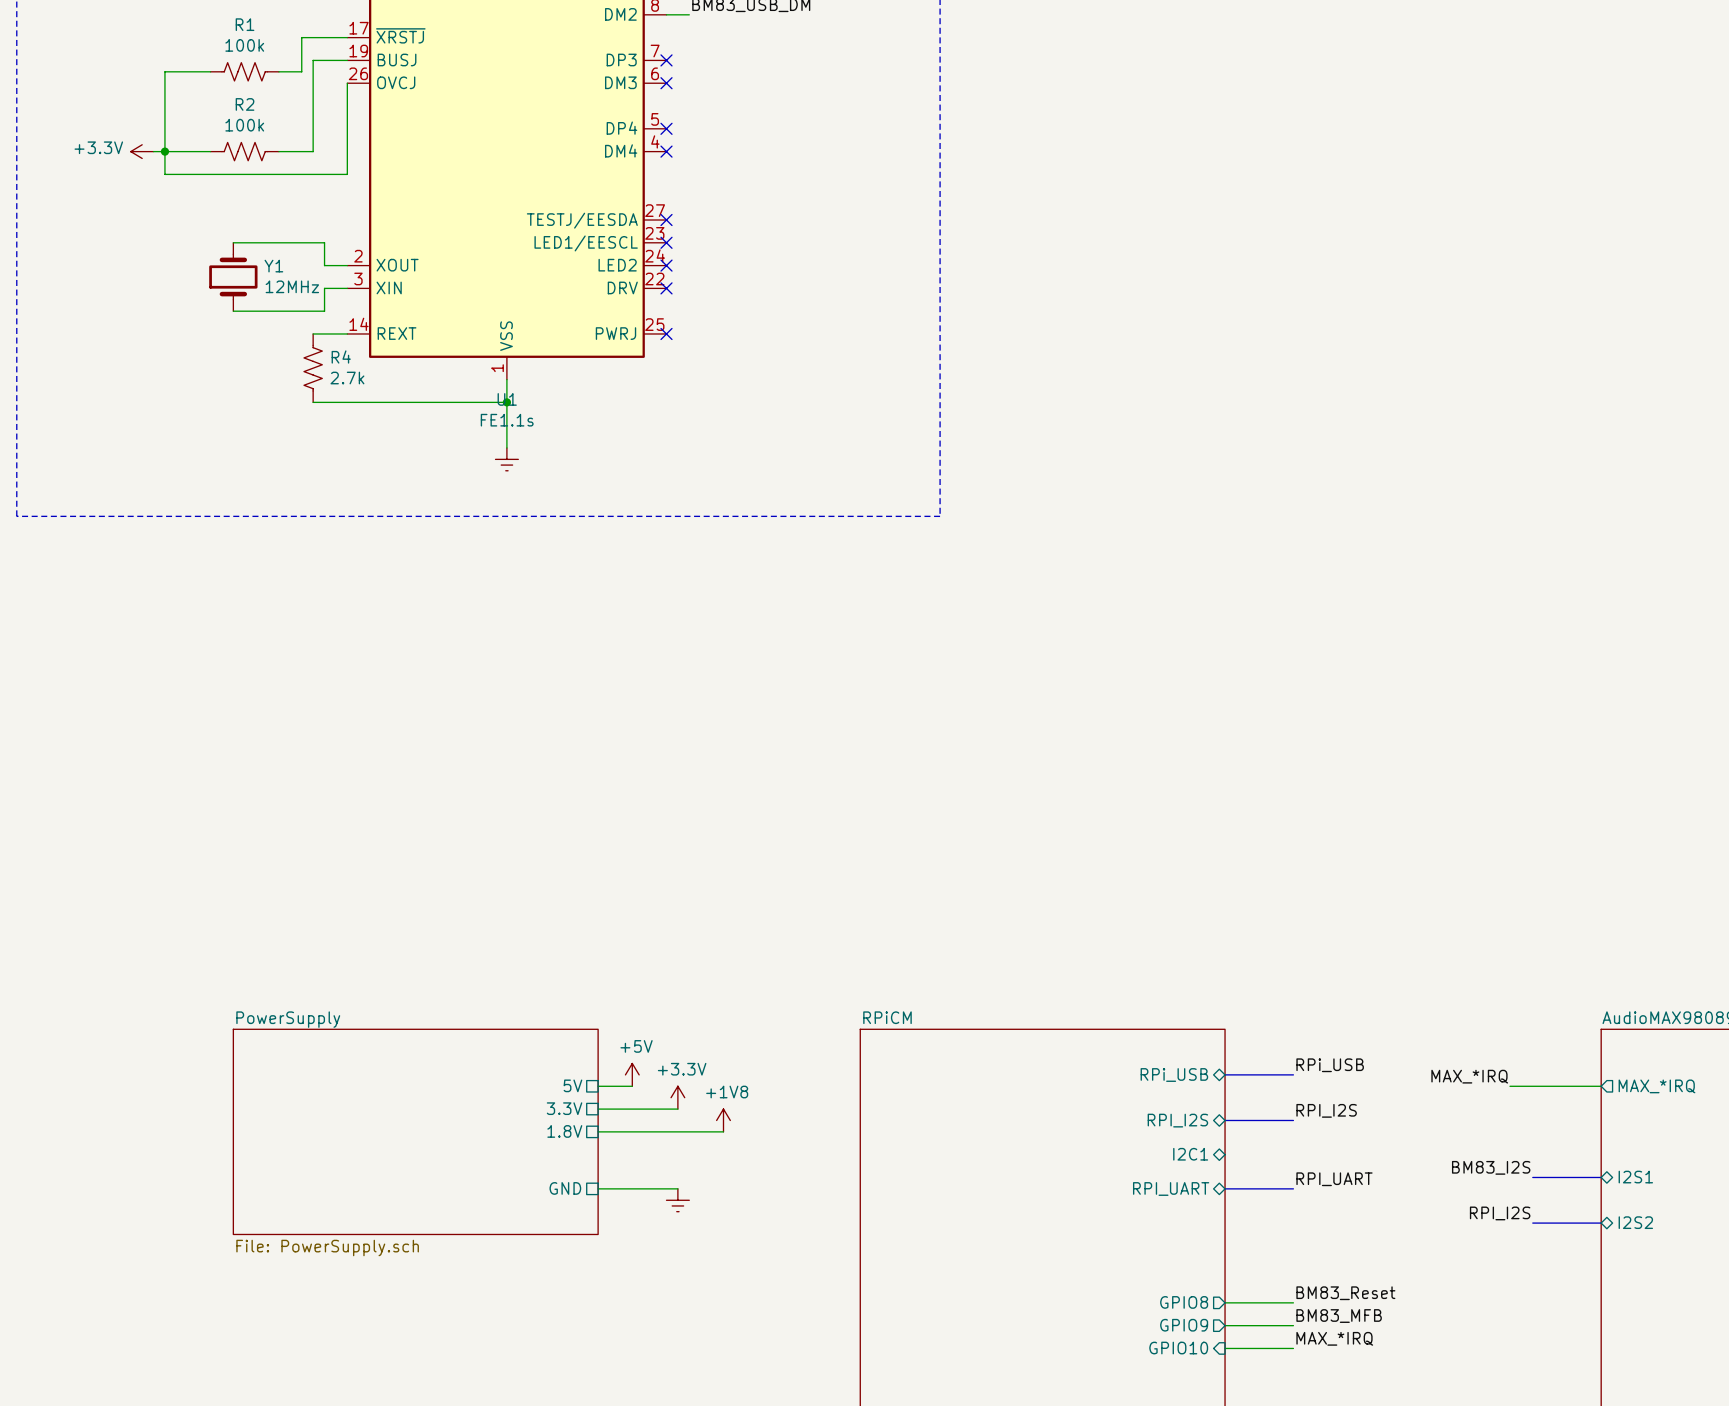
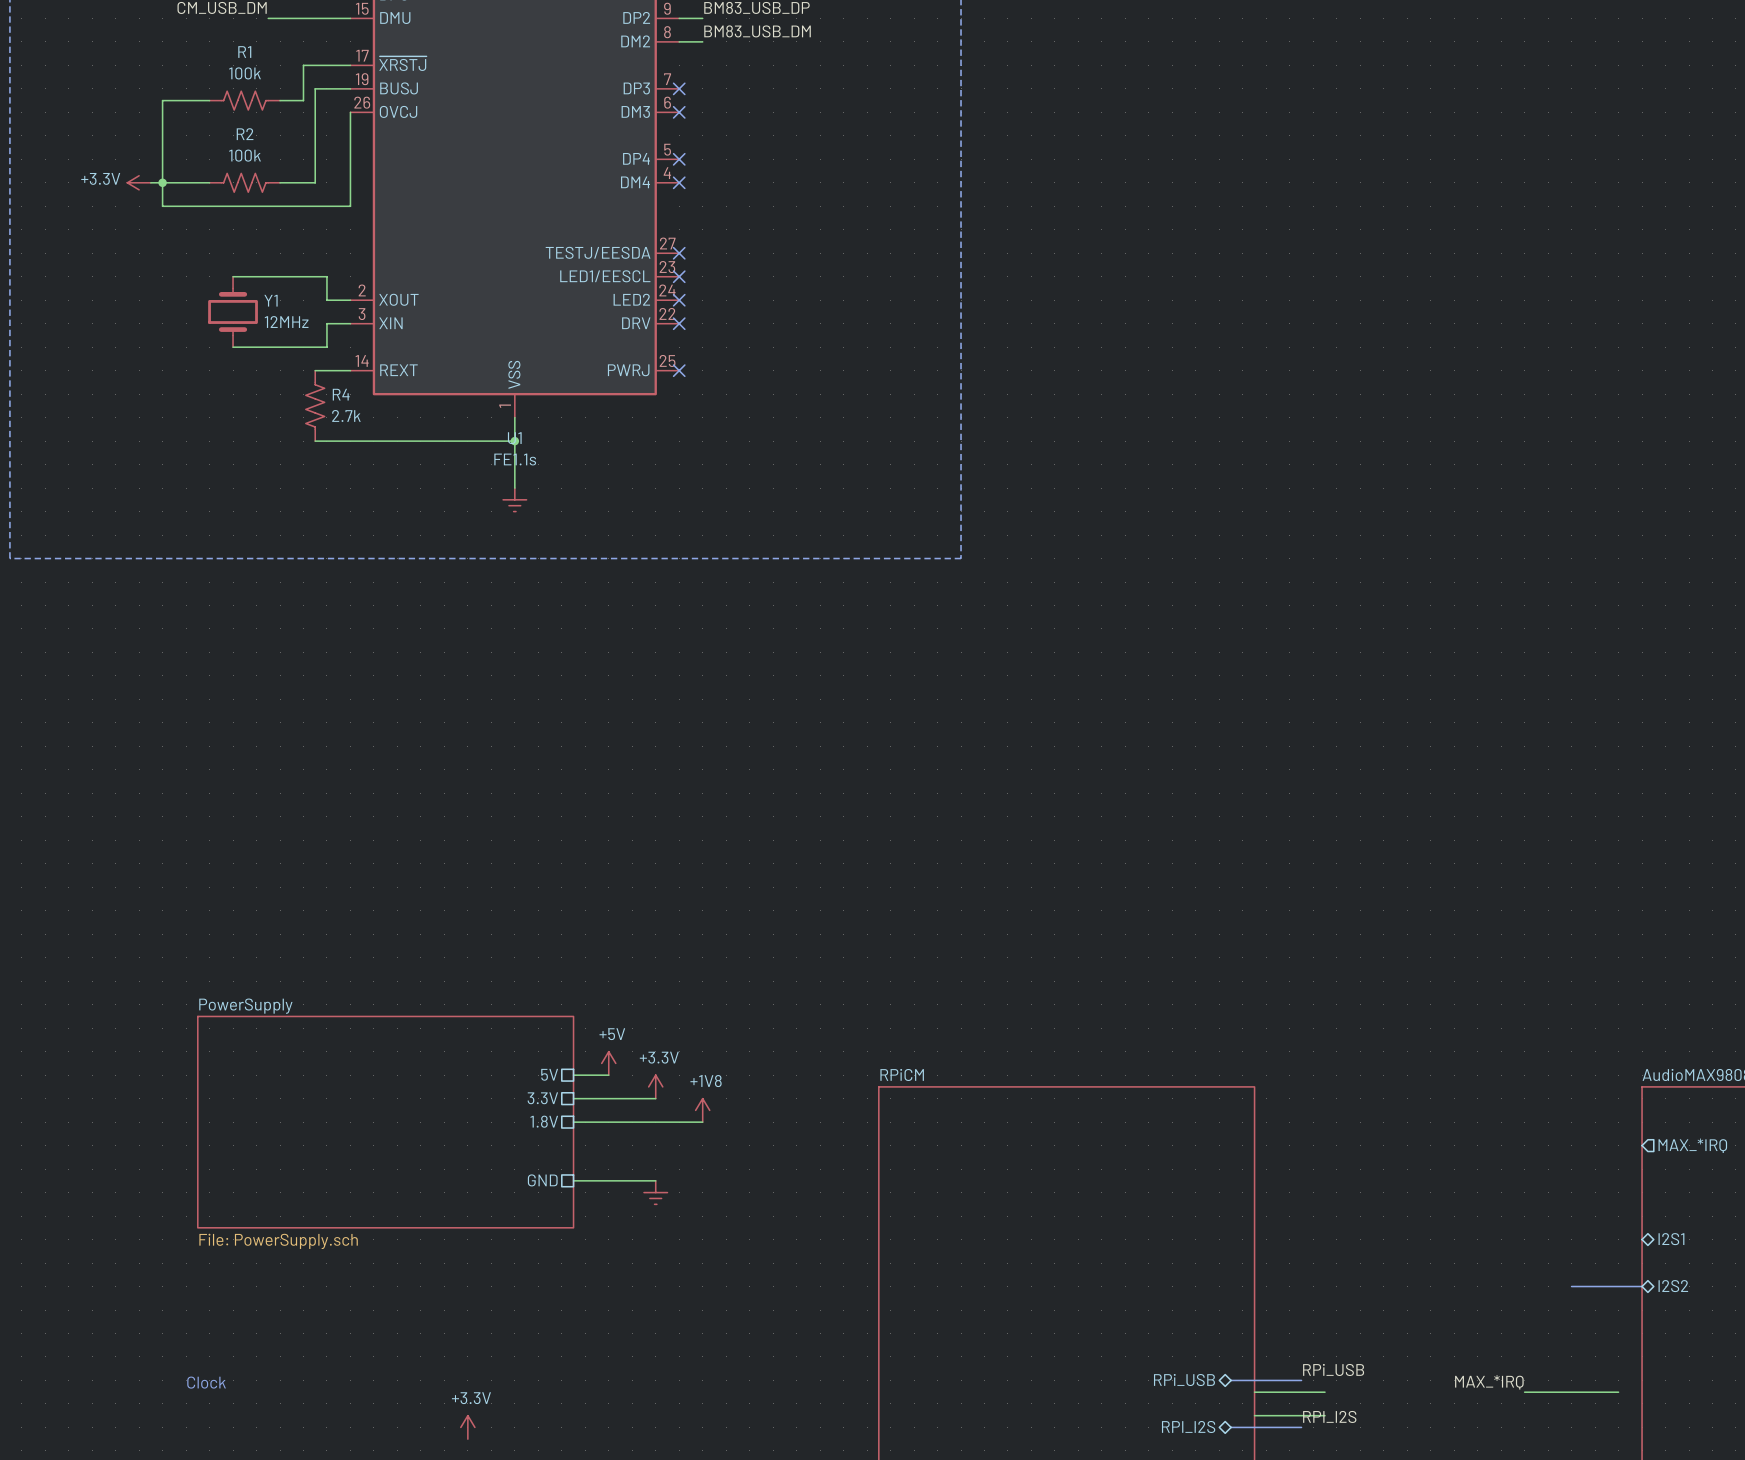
label: RPi_USB (1330, 1065) -> none
power symbol position: +5V (632, 1074) -> +5V (608, 1063)
bus: (1225, 1074) (1293, 1074) -> none
sheet pin: RPi_USB (1174, 1075) -> none
label: MAX_*IRQ (1469, 1076) -> none
sheet pin position: 5V (572, 1085) -> 5V (549, 1074)
wire: (598, 1086) (632, 1086) -> (573, 1075) (608, 1075)
wire: (1509, 1086) (1601, 1086) -> none
power symbol position: +3.3V (677, 1097) -> +3.3V (655, 1086)
sheet pin position: 3.3V (564, 1108) -> 3.3V (542, 1098)
wire: (598, 1109) (677, 1109) -> (573, 1098) (655, 1098)
label: RPI_I2S (1326, 1110) -> none
power symbol position: +1V8 (723, 1120) -> +1V8 (702, 1110)
sheet pin: RPI_I2S (1177, 1120) -> none
bus: (1225, 1120) (1293, 1120) -> none
sheet PowerSupply position: (415, 1131) -> (385, 1122)
sheet pin position: 1.8V (564, 1131) -> 1.8V (544, 1121)
wire: (598, 1131) (723, 1131) -> (573, 1122) (702, 1122)
sheet pin: I2C1 (1190, 1154) -> none
label: BM83_I2S (1491, 1167) -> none
bus: (1532, 1177) (1601, 1177) -> none
label: RPI_UART (1334, 1179) -> none
sheet pin position: GND (565, 1188) -> GND (542, 1180)
wire: (598, 1188) (677, 1188) -> (573, 1180) (655, 1180)
sheet pin: RPI_UART (1171, 1188) -> none
bus: (1225, 1188) (1293, 1188) -> (1231, 1380) (1301, 1380)
power symbol position: (677, 1200) -> (655, 1192)
label: RPI_I2S (1500, 1213) -> none
label: BM83_Reset (1345, 1293) -> none
sheet pin: GPIO8 (1184, 1302) -> none
wire: (1225, 1302) (1293, 1302) -> none
label: none -> RPi_USB (1333, 1369)
sheet pin: none -> RPi_USB (1184, 1380)
text: none -> Clock (206, 1382)
label: BM83_MFB (1339, 1316) -> none
sheet pin: GPIO9 (1184, 1325) -> none
wire: none -> (1524, 1392) (1618, 1392)
label position: MAX_*IRQ (1334, 1338) -> MAX_*IRQ (1489, 1382)
sheet pin: GPIO10 (1178, 1348) -> none
label: none -> RPI_I2S (1329, 1416)
power symbol: none -> +3.3V (467, 1427)
sheet pin: none -> RPI_I2S (1188, 1426)
bus: none -> (1231, 1427) (1301, 1427)

